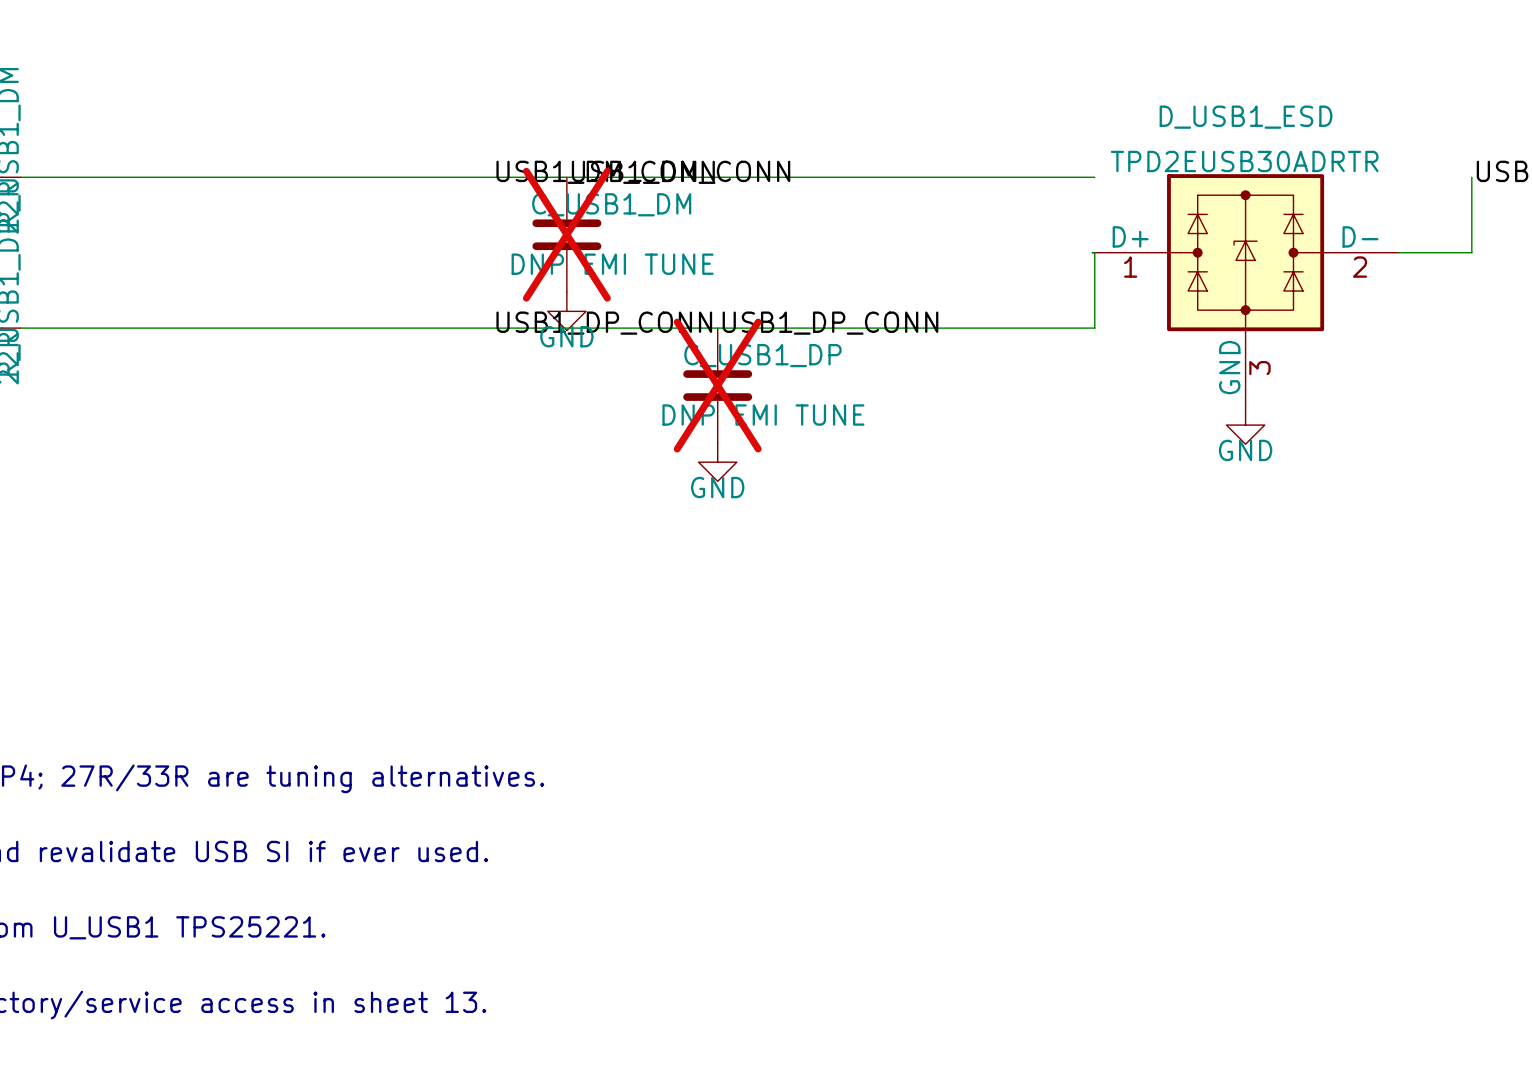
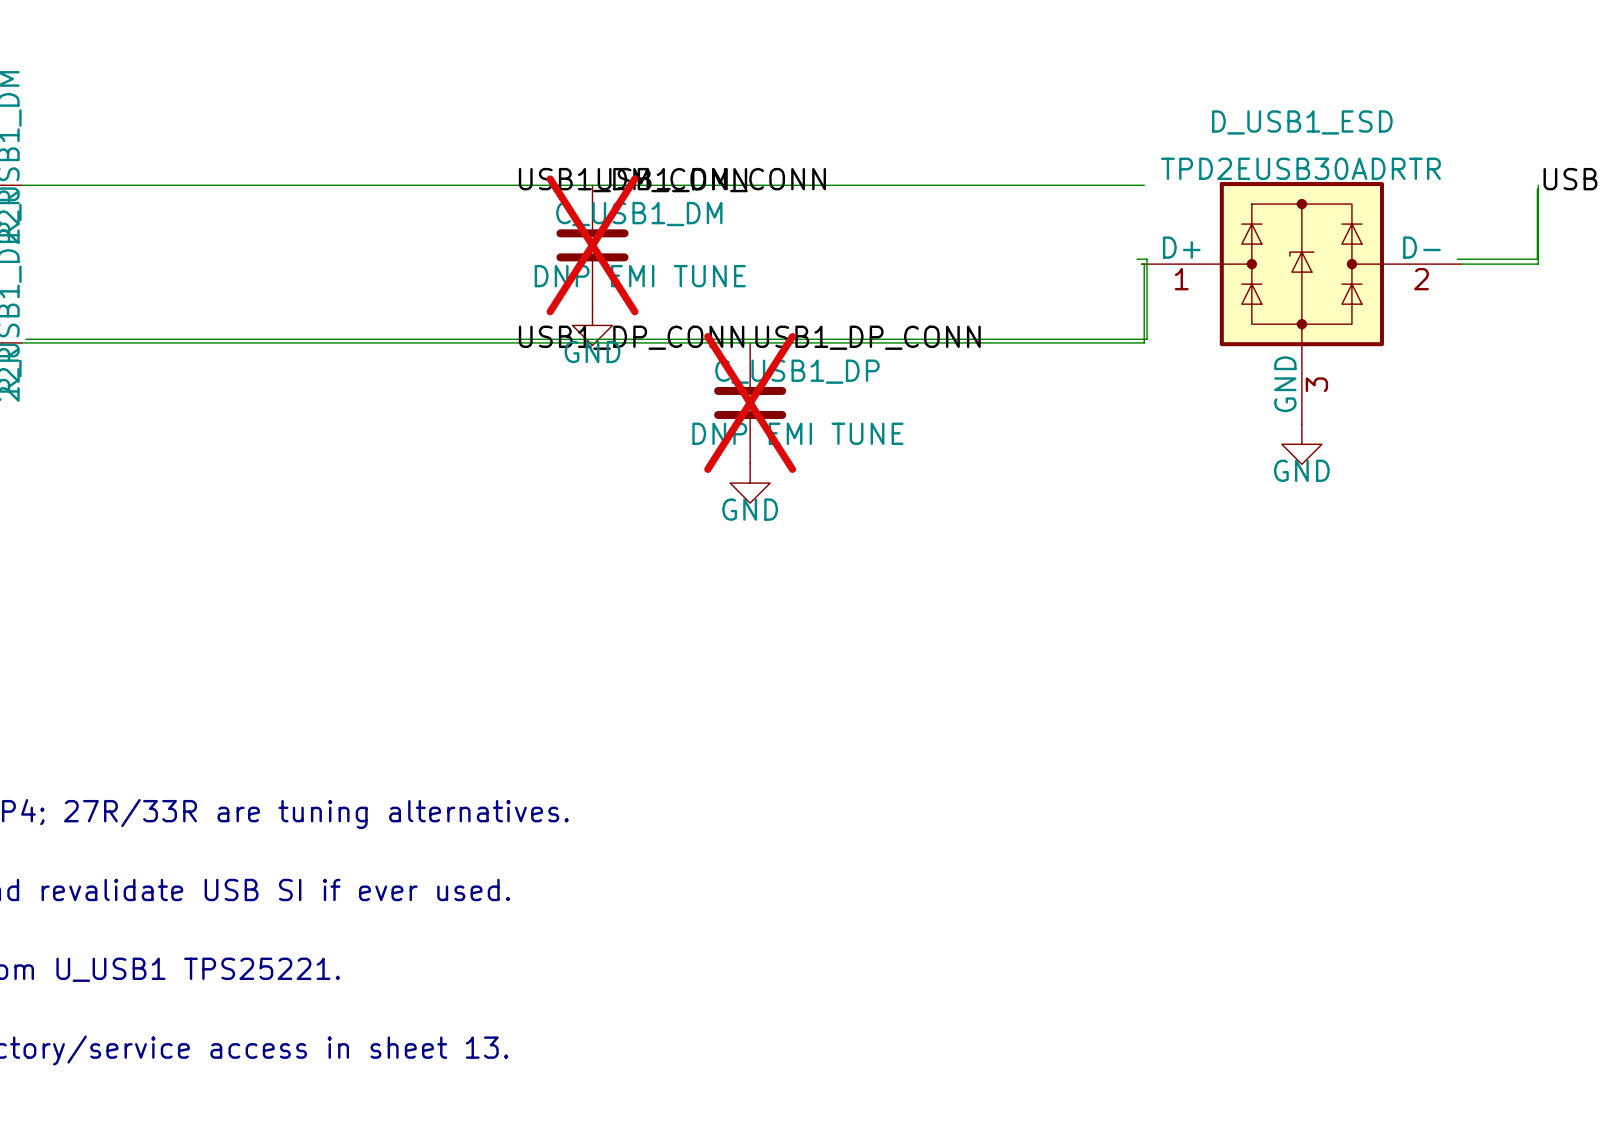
wire: none -> (1537, 189) (1537, 259) (1457, 259)
wire: none -> (1137, 259) (1147, 259) (1147, 339) (25, 339)

